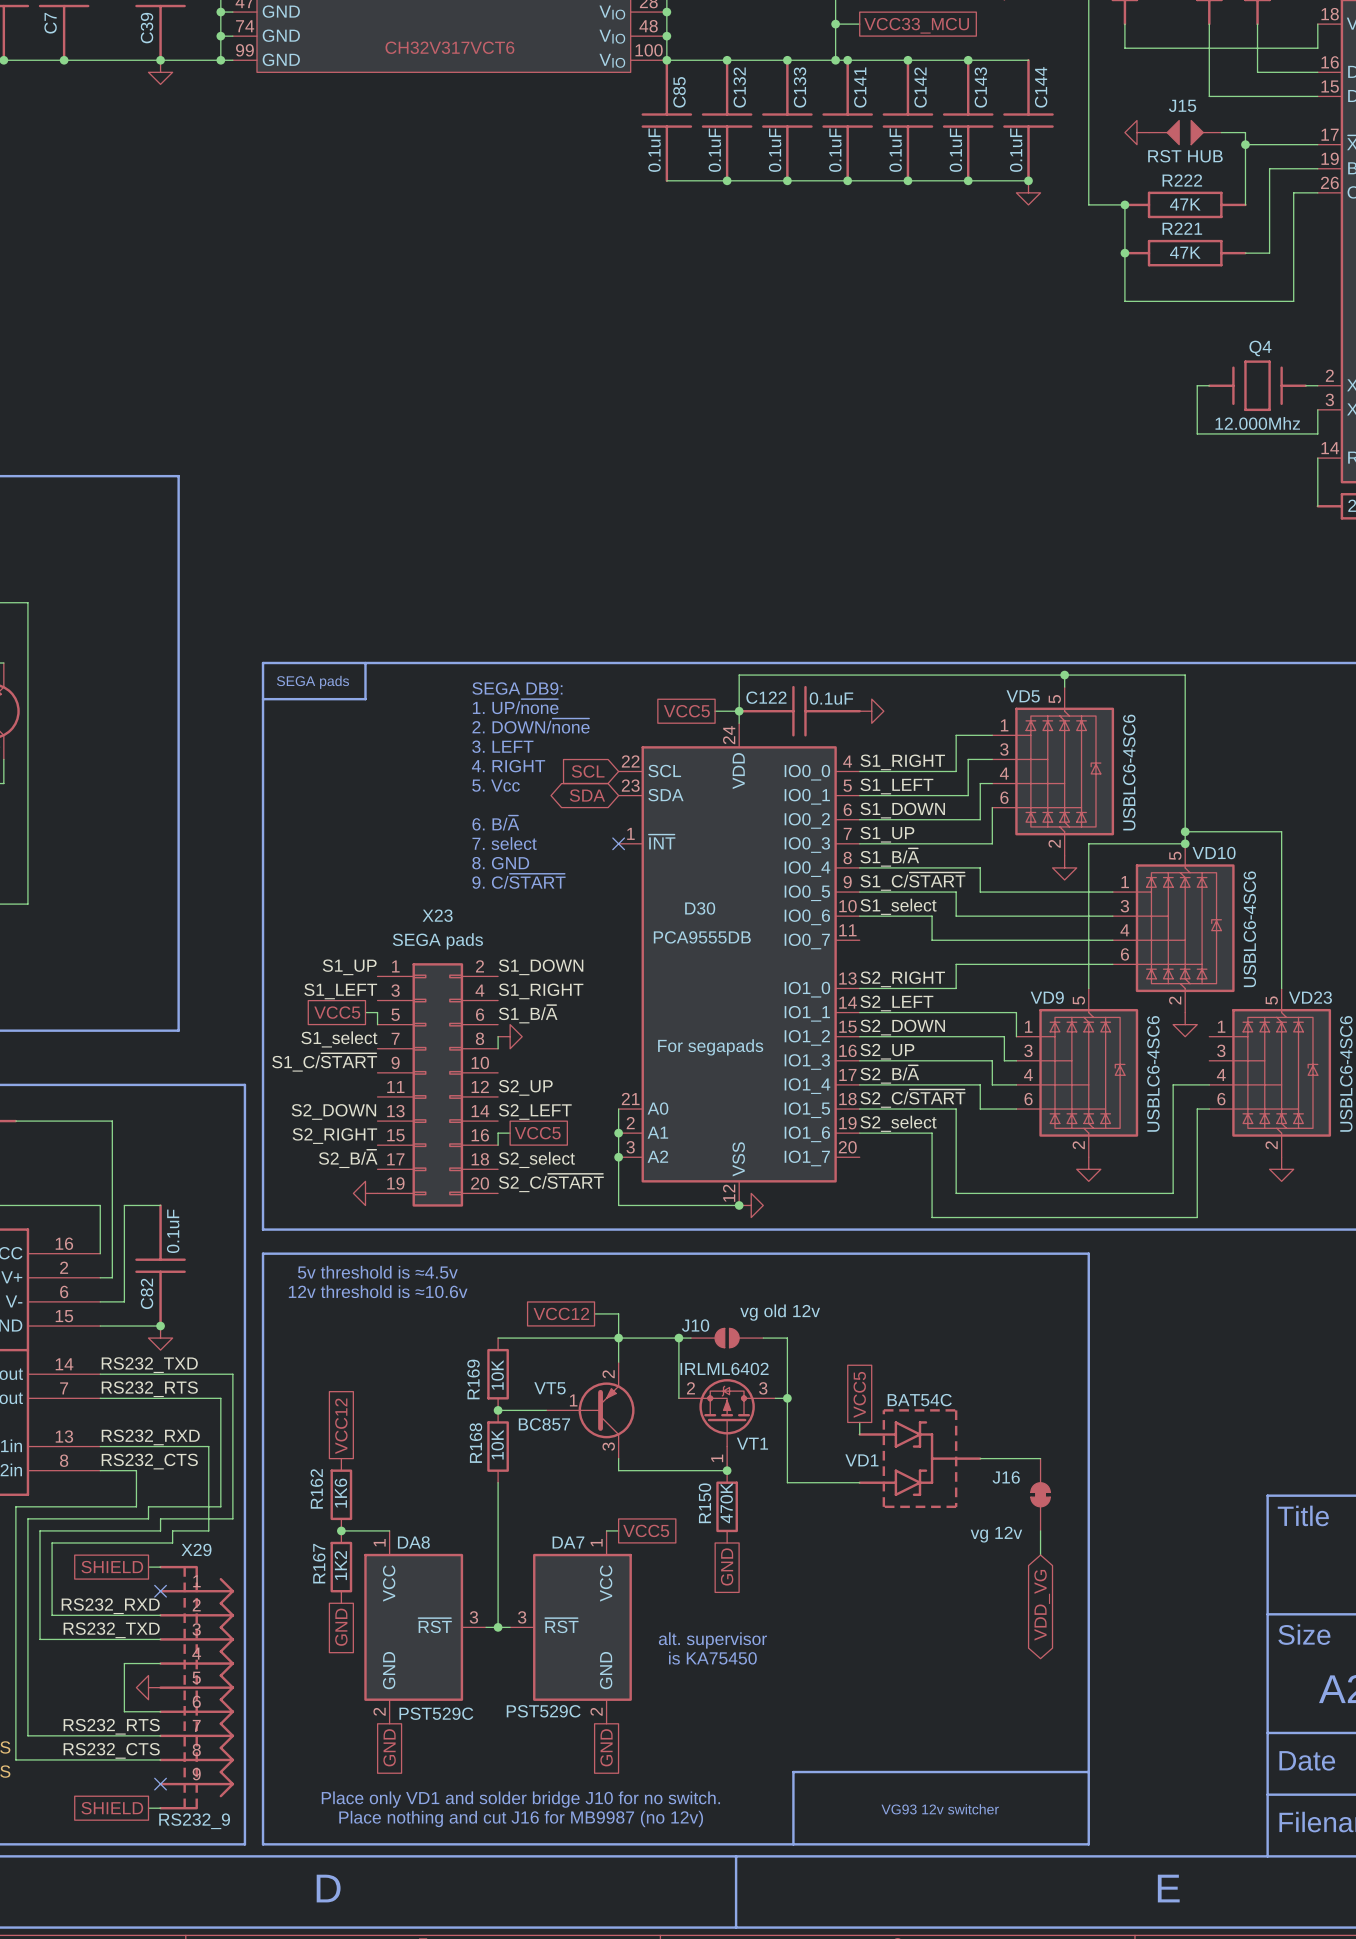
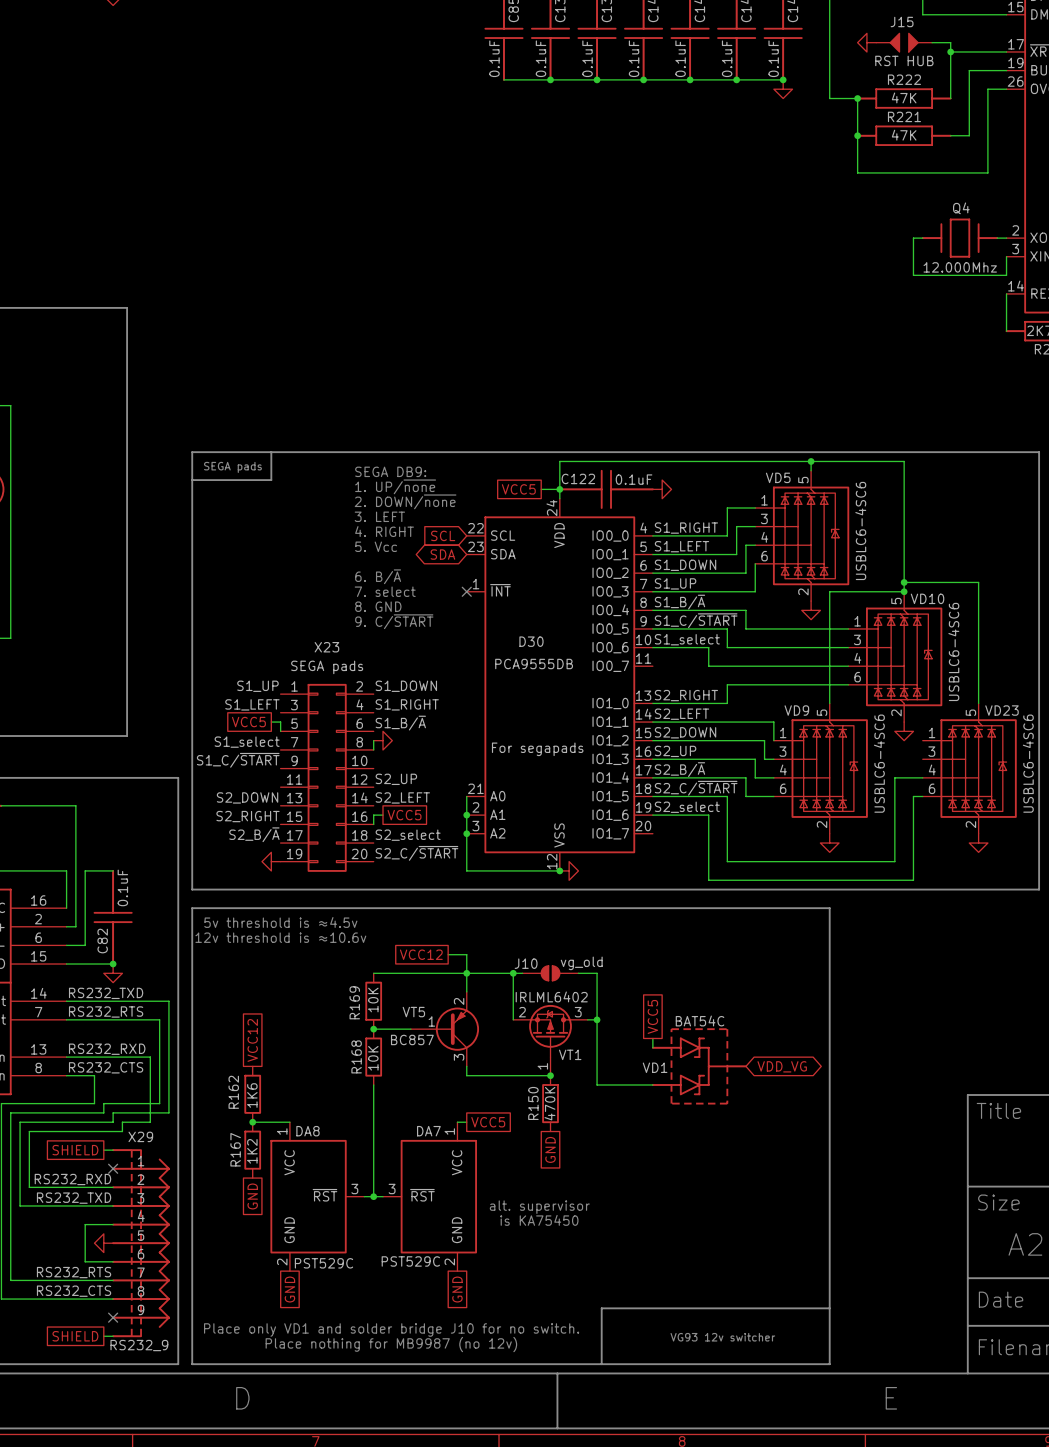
J10 value: vg old 12v (780, 1312) -> vg_old (581, 963)
wire: (980, 1458) (1040, 1458) -> none
J16: vg 12v (1040, 1494) -> none
wire: (1040, 1530) (1040, 1555) -> none
global label rotation: 0° (1042, 1605) -> 90° counterclockwise (782, 1066)
global label position: VDD_VG (1042, 1605) -> VDD_VG (782, 1066)
text: Place nothing and cut J16 for MB9987 (no 12v) (521, 1818) -> Place nothing for MB9987 (no 12v) (391, 1344)

